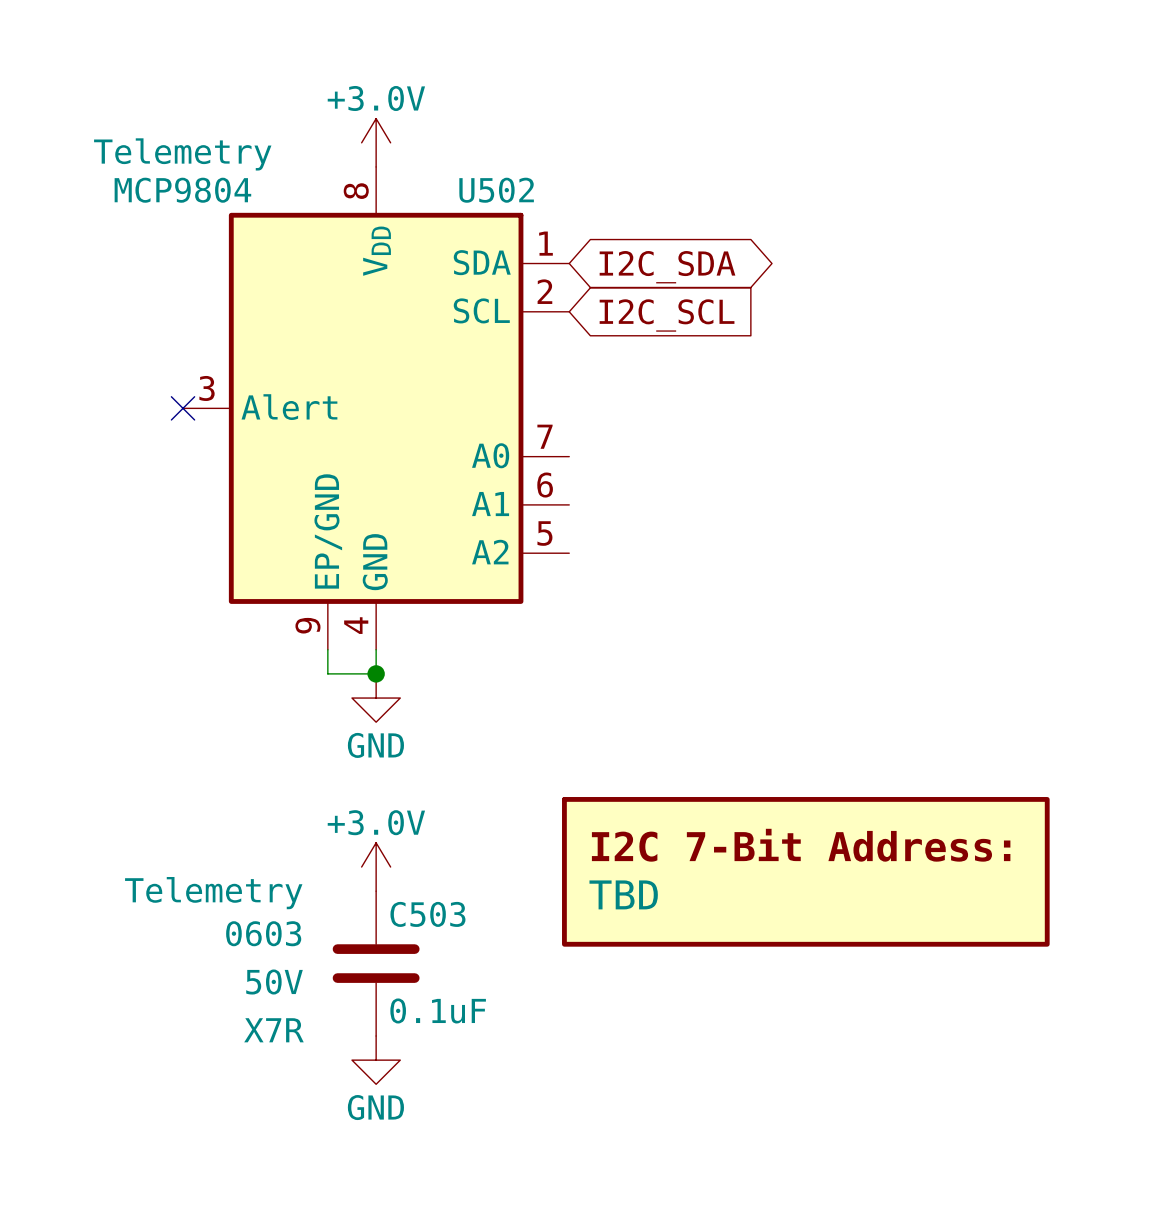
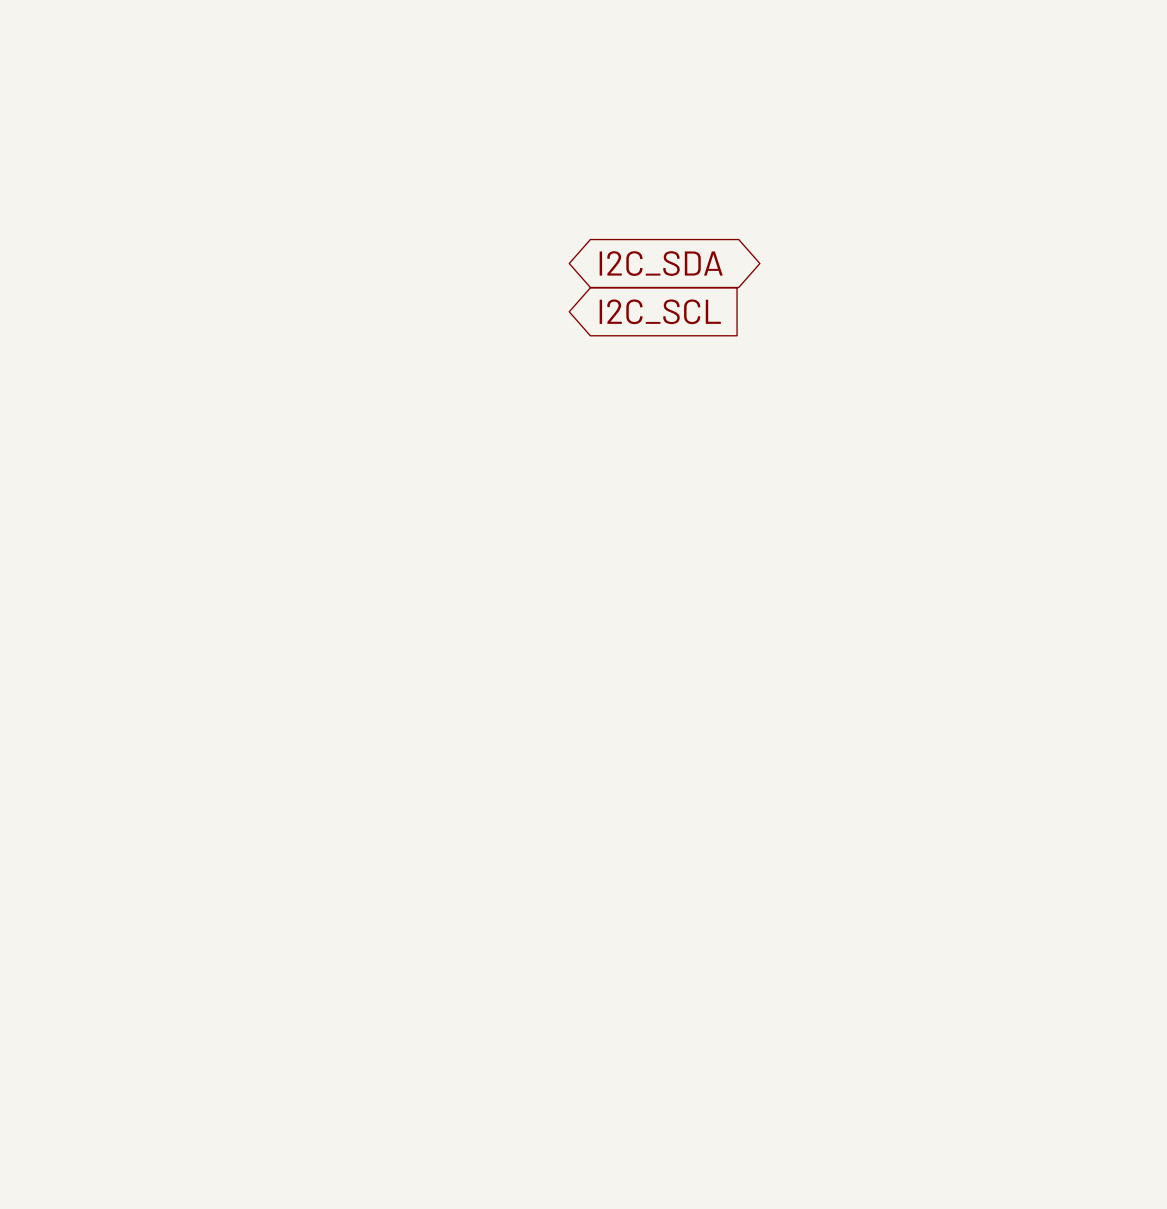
power symbol: +3.0V (376, 142) -> none
no-connect mark: (183, 408) -> none
U502: MCP9804 (376, 408) -> none
wire: (327, 649) (327, 673) (376, 673) (376, 649) -> none
junction: (376, 673) -> none
power symbol: GND (376, 698) -> none
power symbol: +3.0V (376, 867) -> none
part: TBD (805, 871) -> none
C503: 0.1uF (376, 963) -> none
power symbol: GND (376, 1060) -> none

